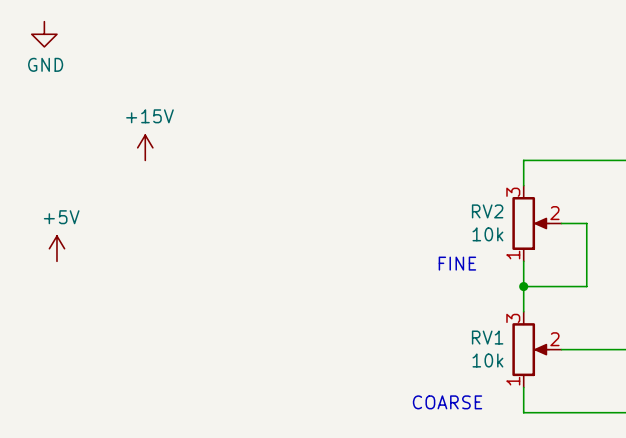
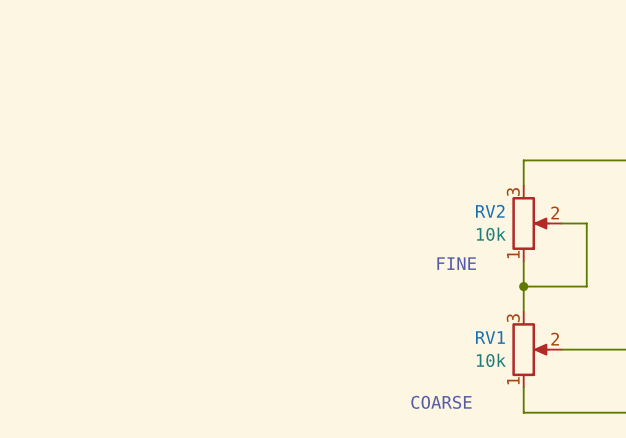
power symbol: GND (44, 34) -> none
power symbol: +15V (145, 147) -> none
power symbol: +5V (56, 248) -> none

